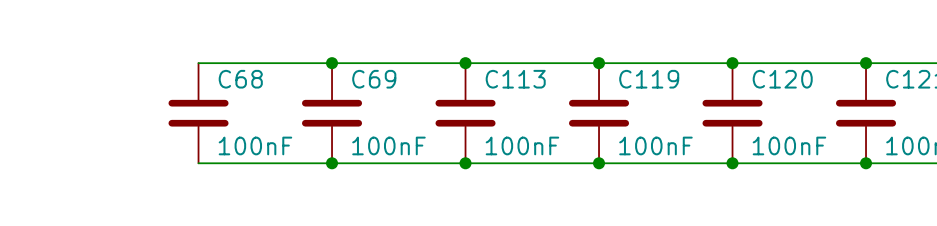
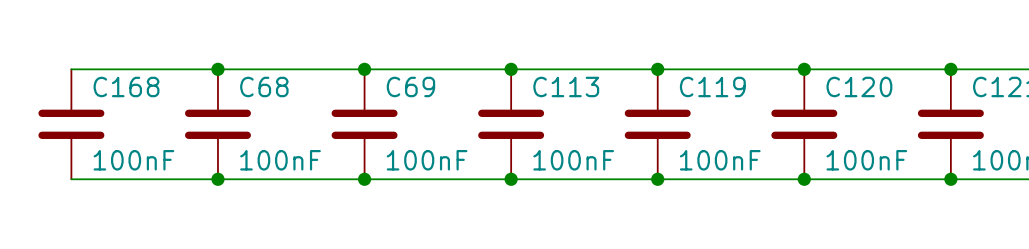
wire: none -> (71, 69) (217, 69)
junction: none -> (217, 69)
C168: none -> 100nF (71, 124)
wire: none -> (71, 179) (217, 179)
junction: none -> (217, 179)

